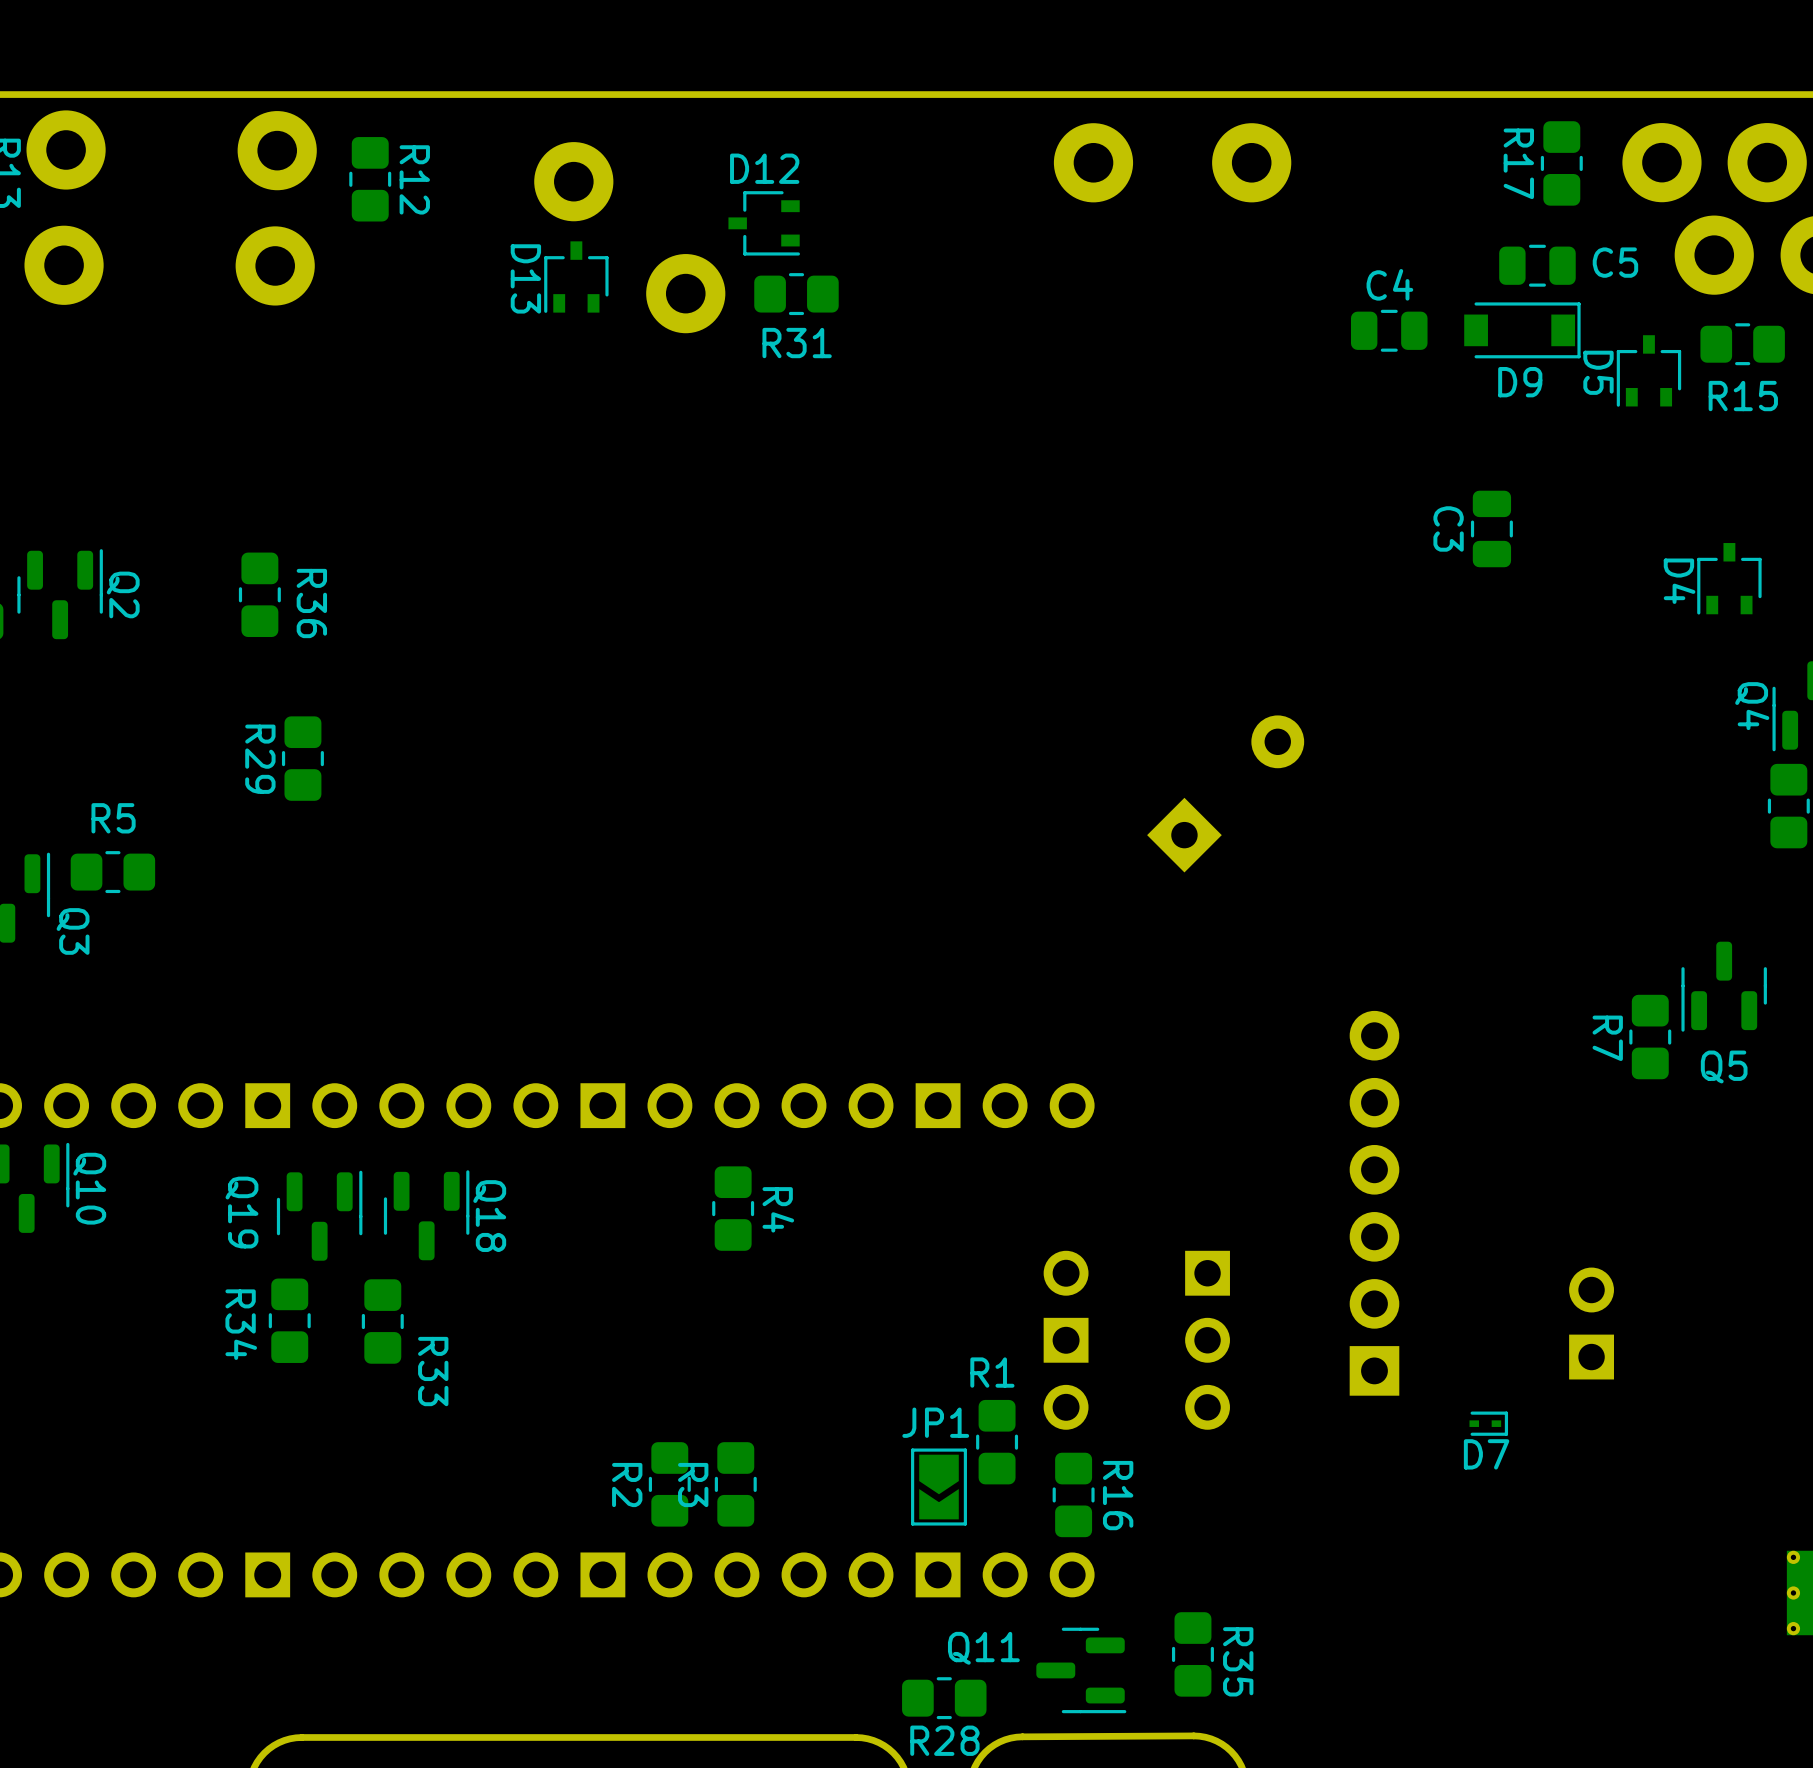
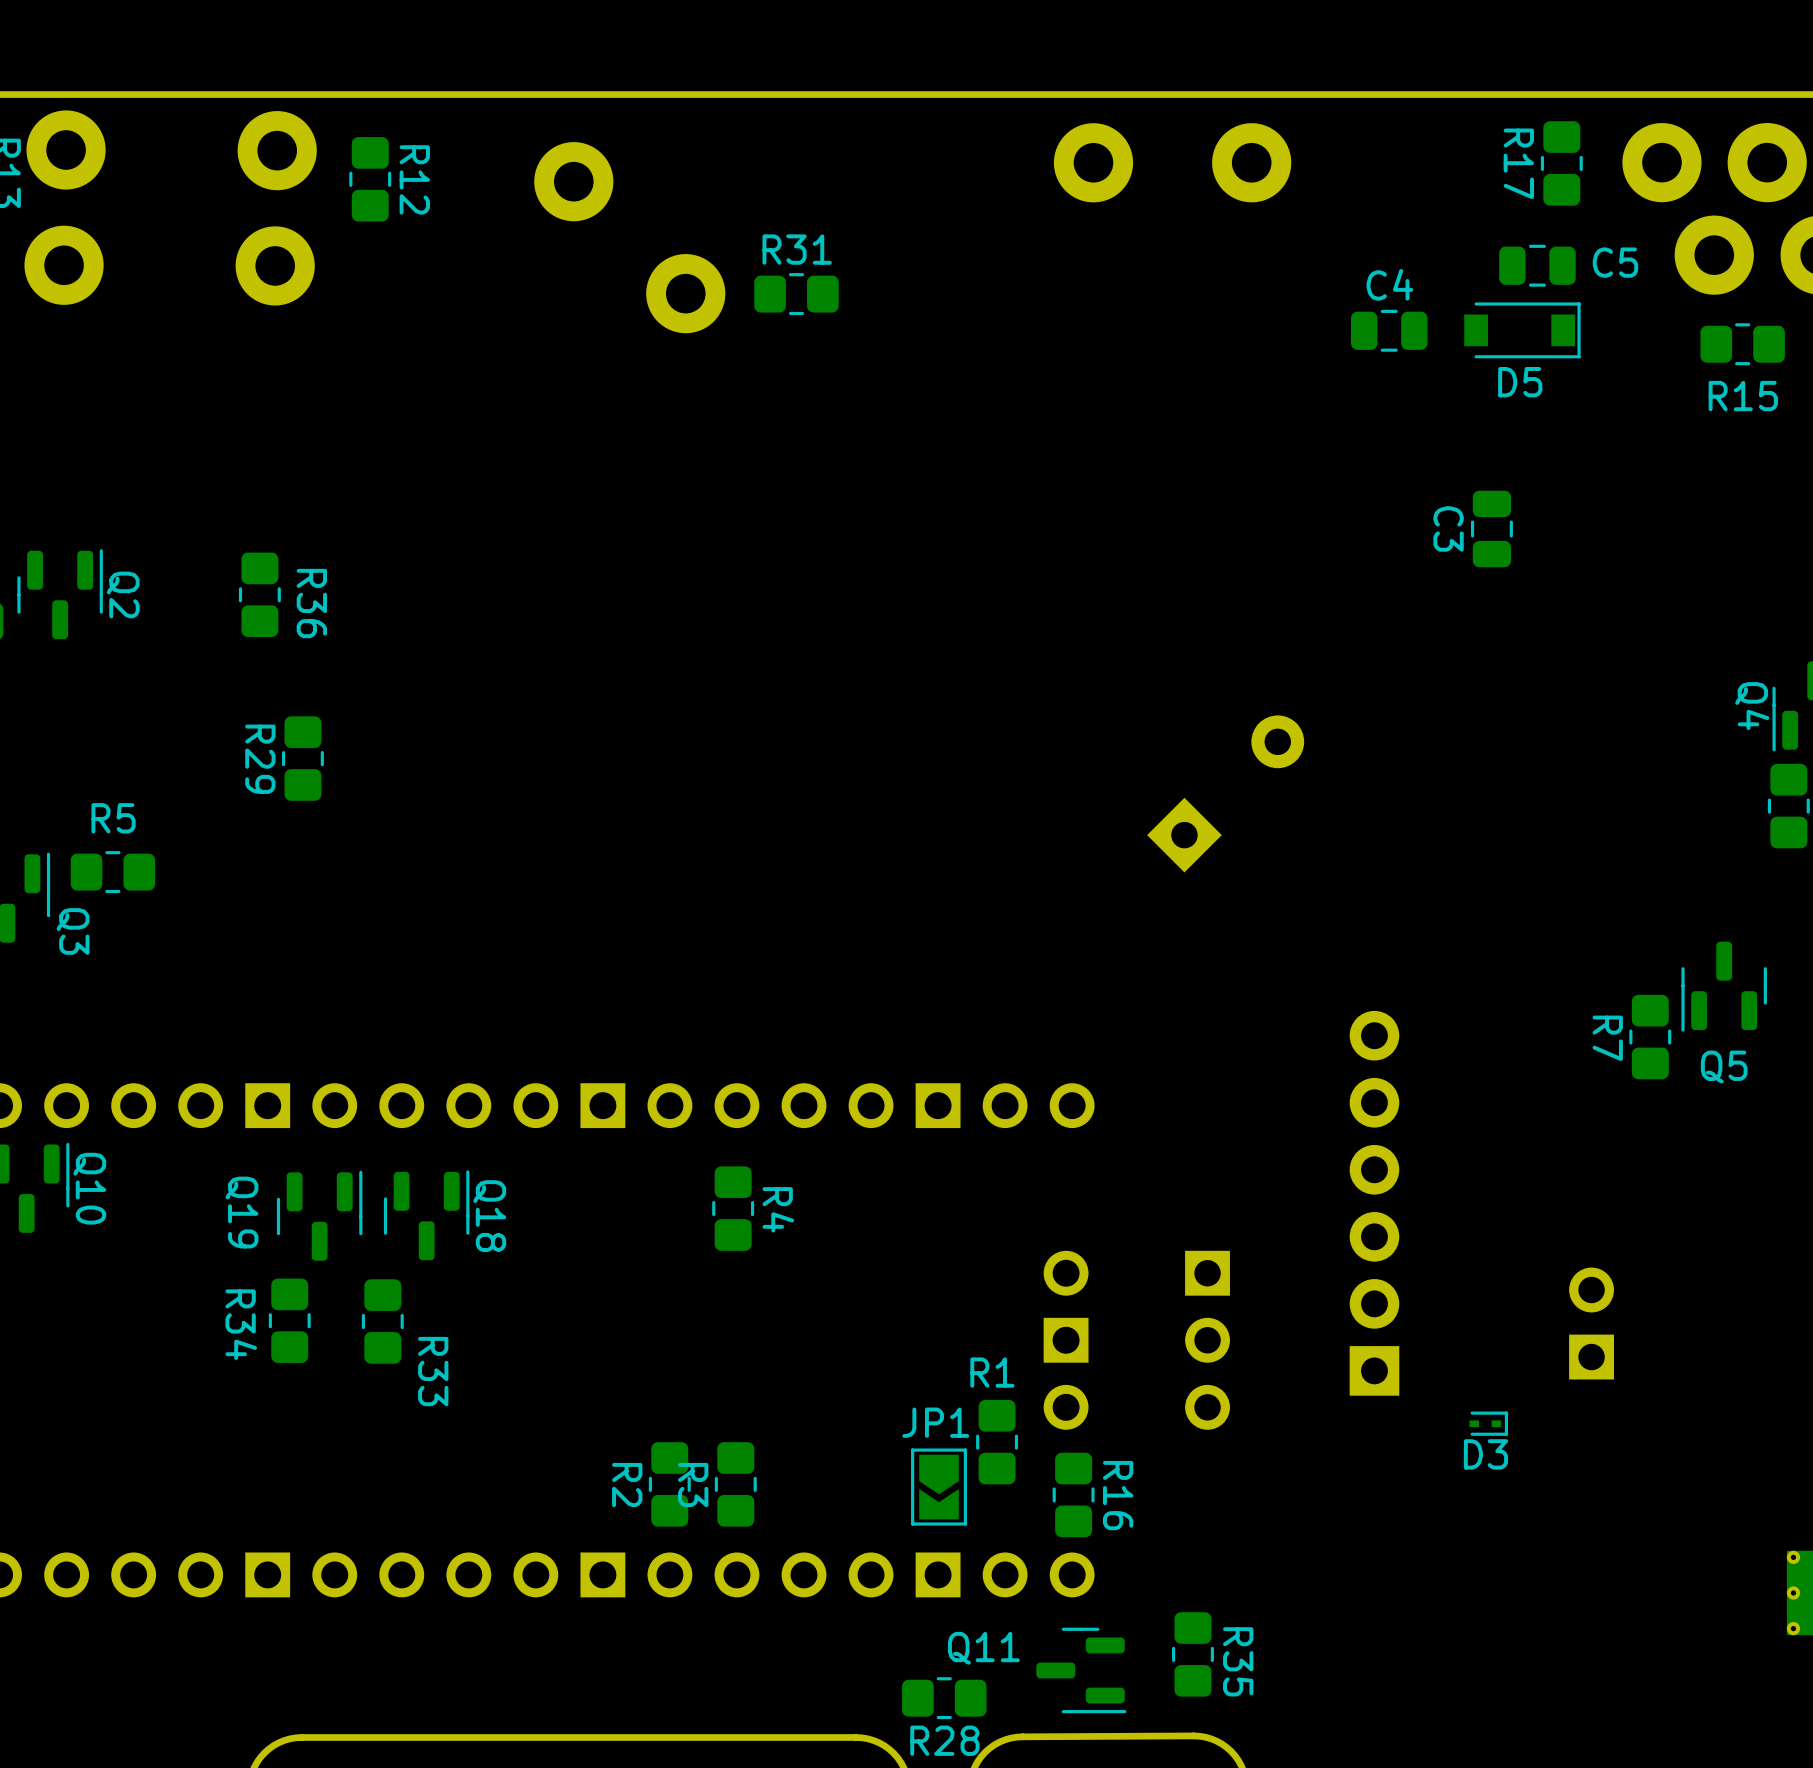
D12: (764, 223) -> none
D13: (576, 277) -> none
R31 name position: R31 (797, 343) -> R31 (797, 249)
D5: (1648, 370) -> none
D9 name: D9 (1520, 382) -> D5 (1520, 382)
D4: (1729, 578) -> none
D7 name: D7 (1486, 1454) -> D3 (1485, 1454)

